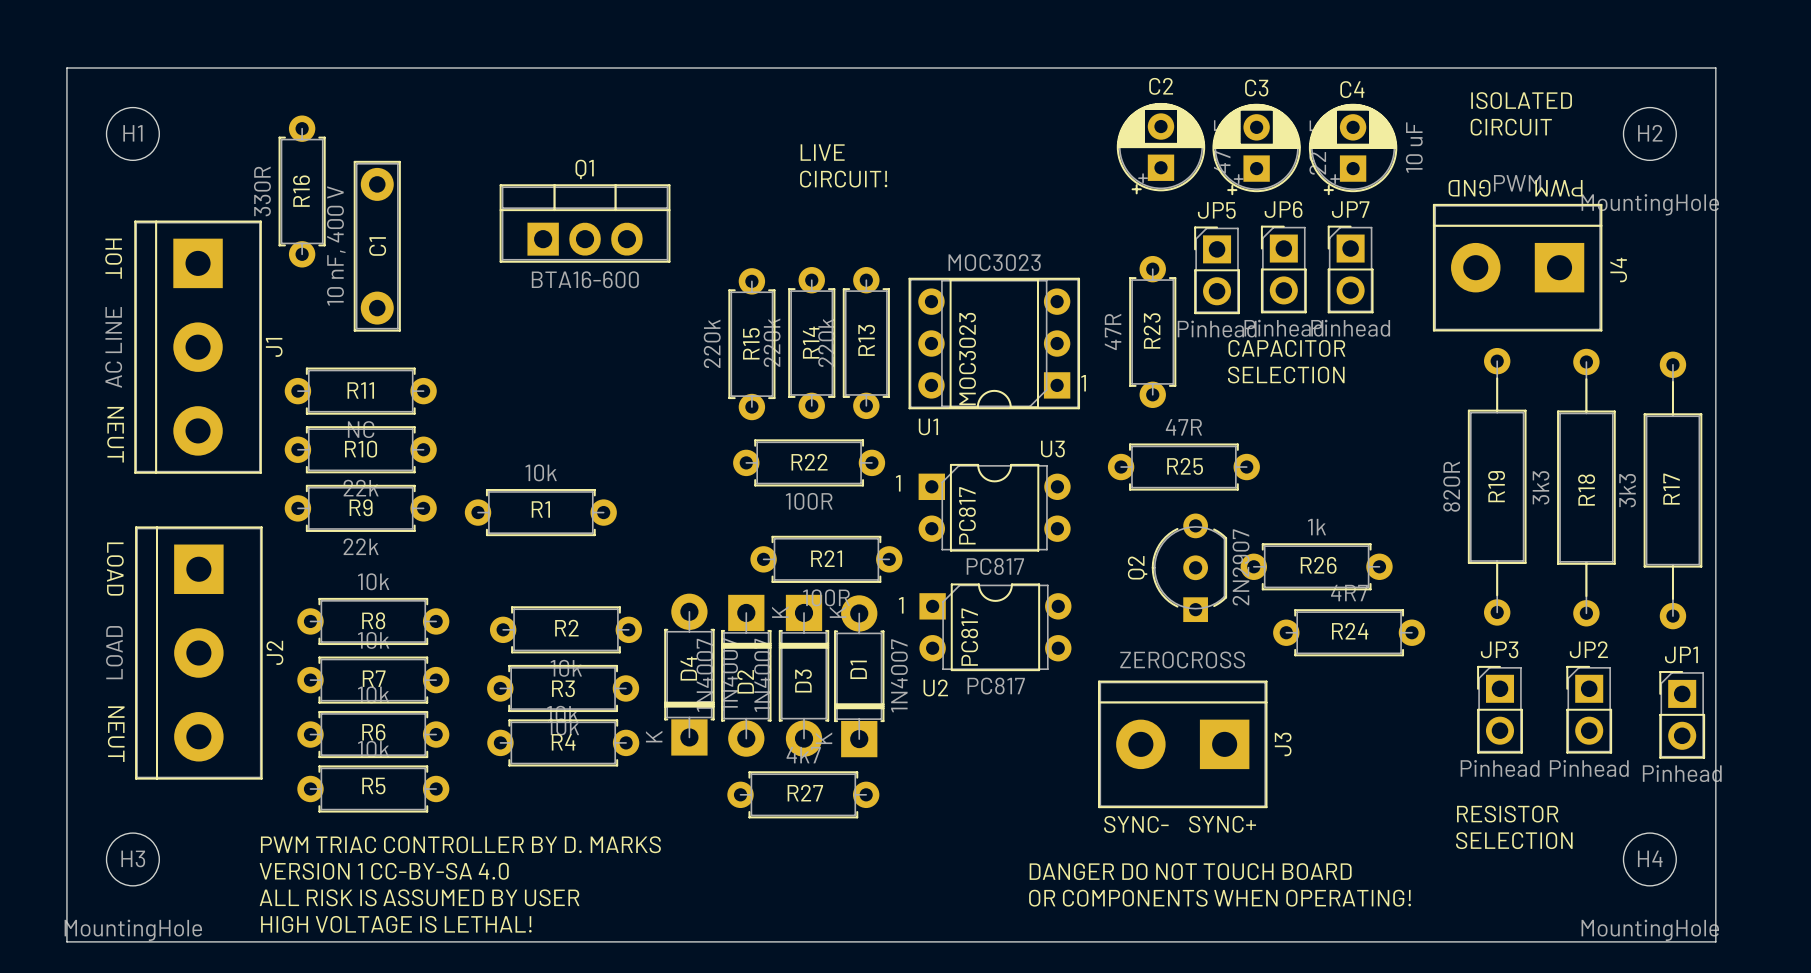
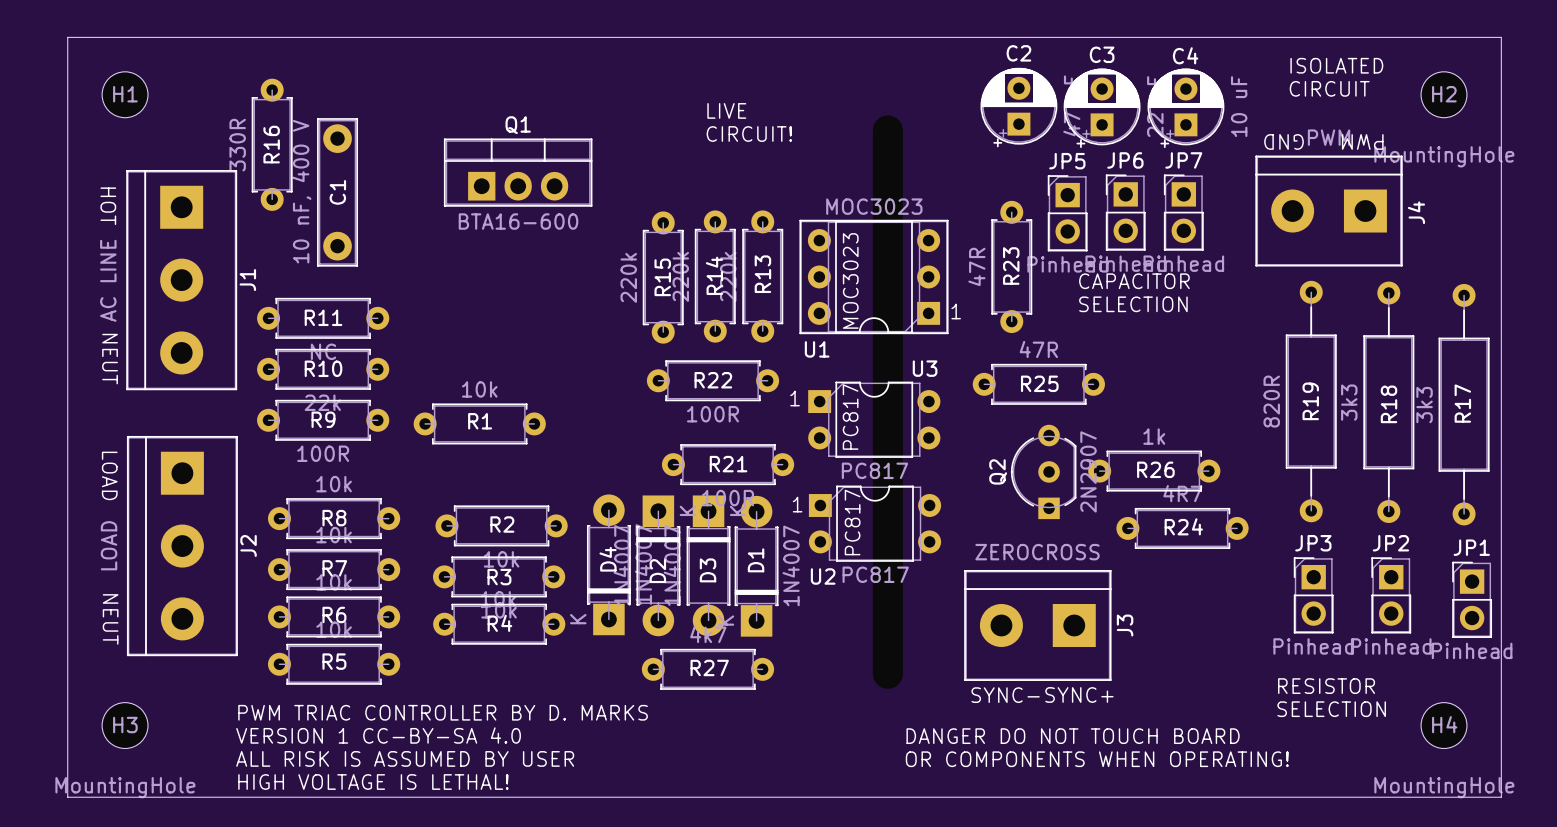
R9 value: 22k (361, 546) -> 100R (323, 453)

